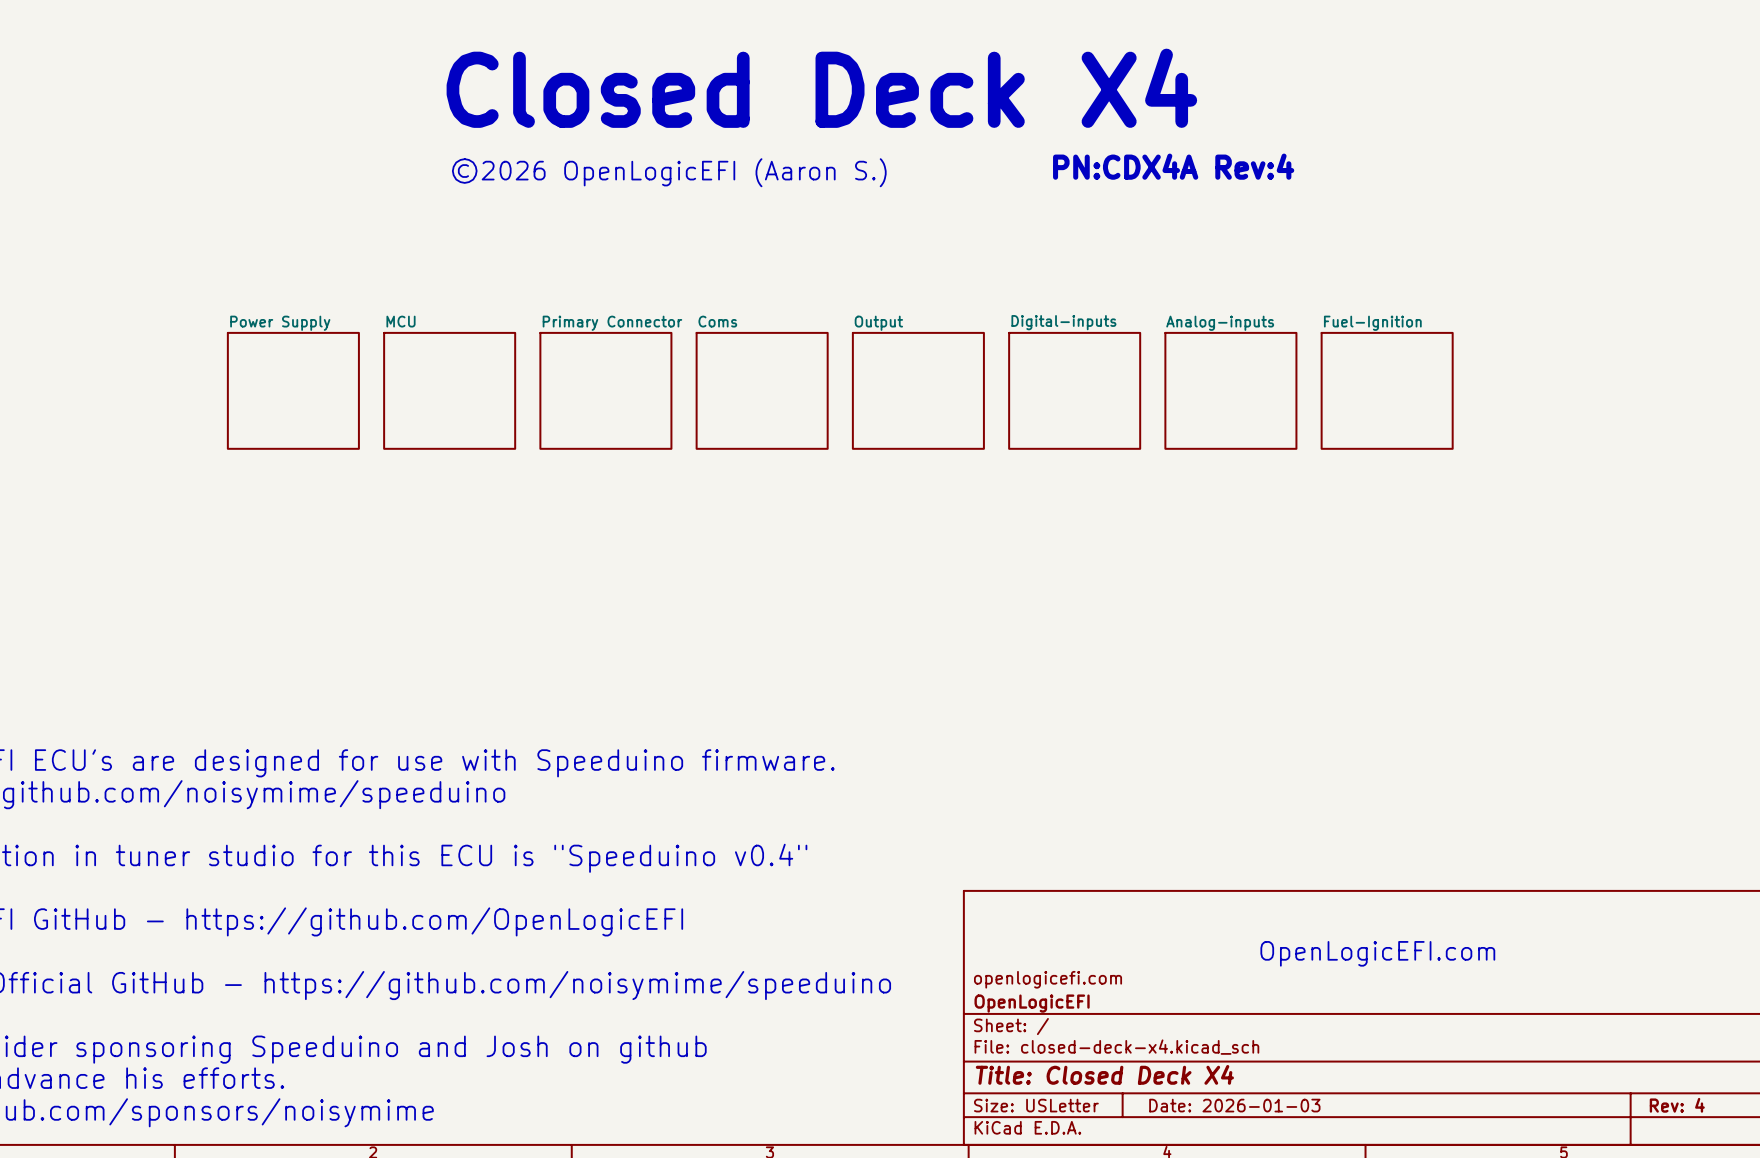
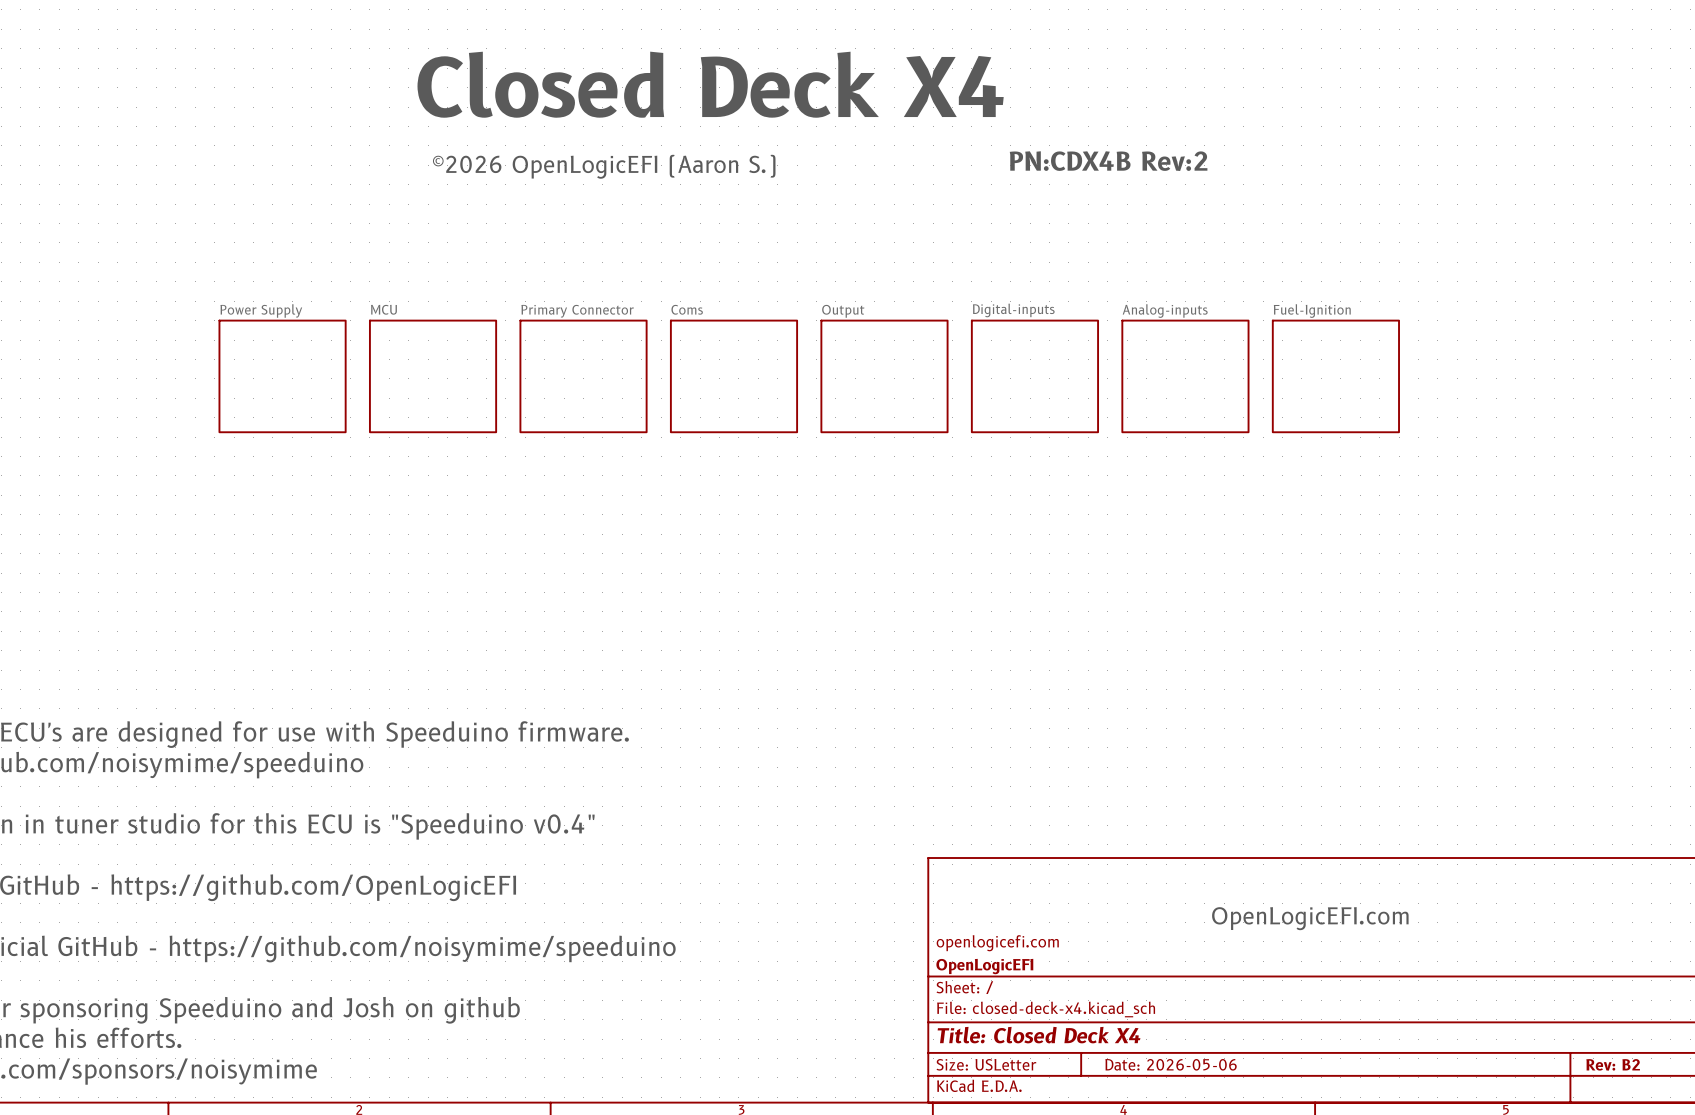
text: PN:CDX4A Rev:4 (1173, 166) -> PN:CDX4B Rev:2 (1108, 161)
title block: Date: 2026-01-03 (1234, 1105) -> Date: 2026-05-06 (1171, 1064)
title block: Rev: 4 (1677, 1105) -> Rev: B2 (1613, 1064)

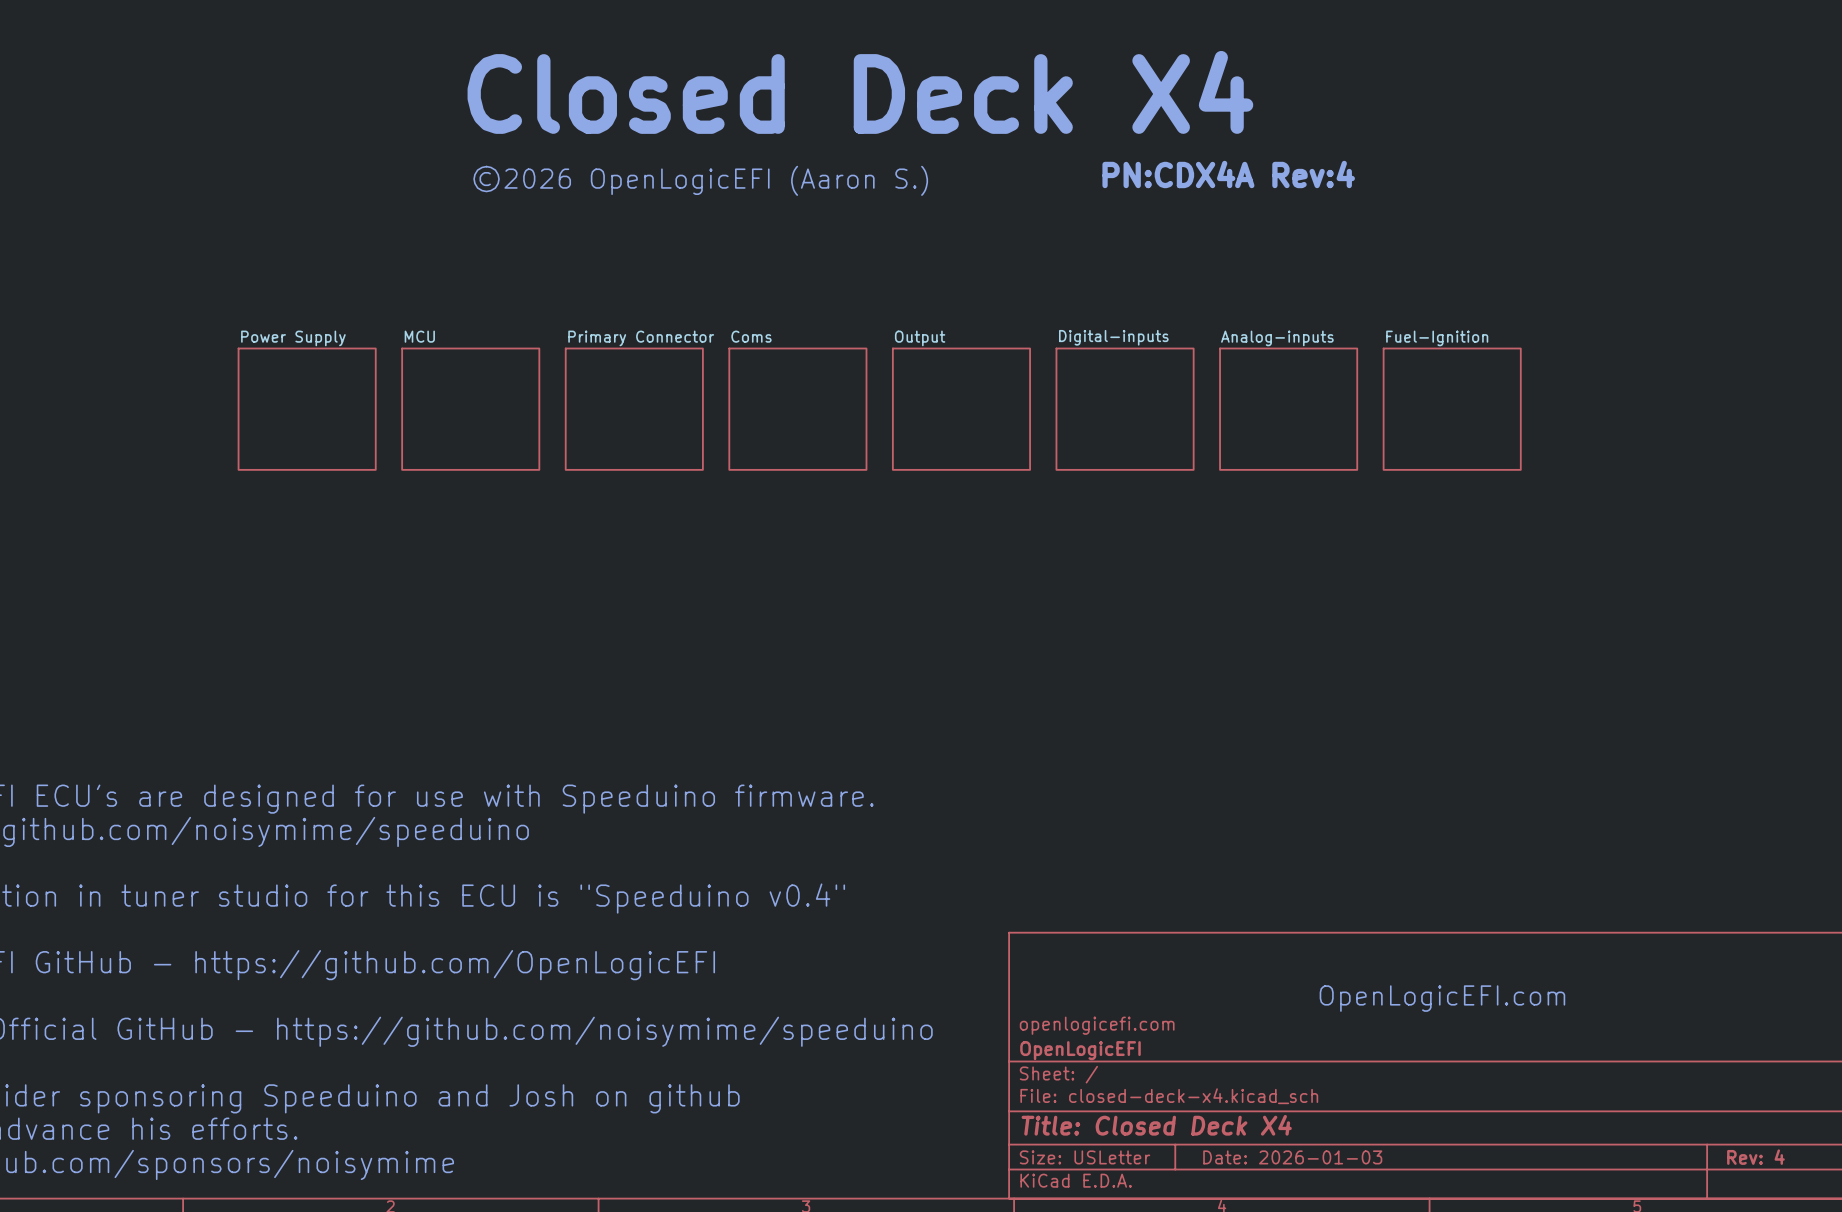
text: PN:CDX4B Rev:2 (1108, 161) -> PN:CDX4A Rev:4 (1228, 174)
title block: Date: 2026-05-06 (1171, 1064) -> Date: 2026-01-03 (1292, 1157)
title block: Rev: B2 (1613, 1064) -> Rev: 4 (1755, 1157)

